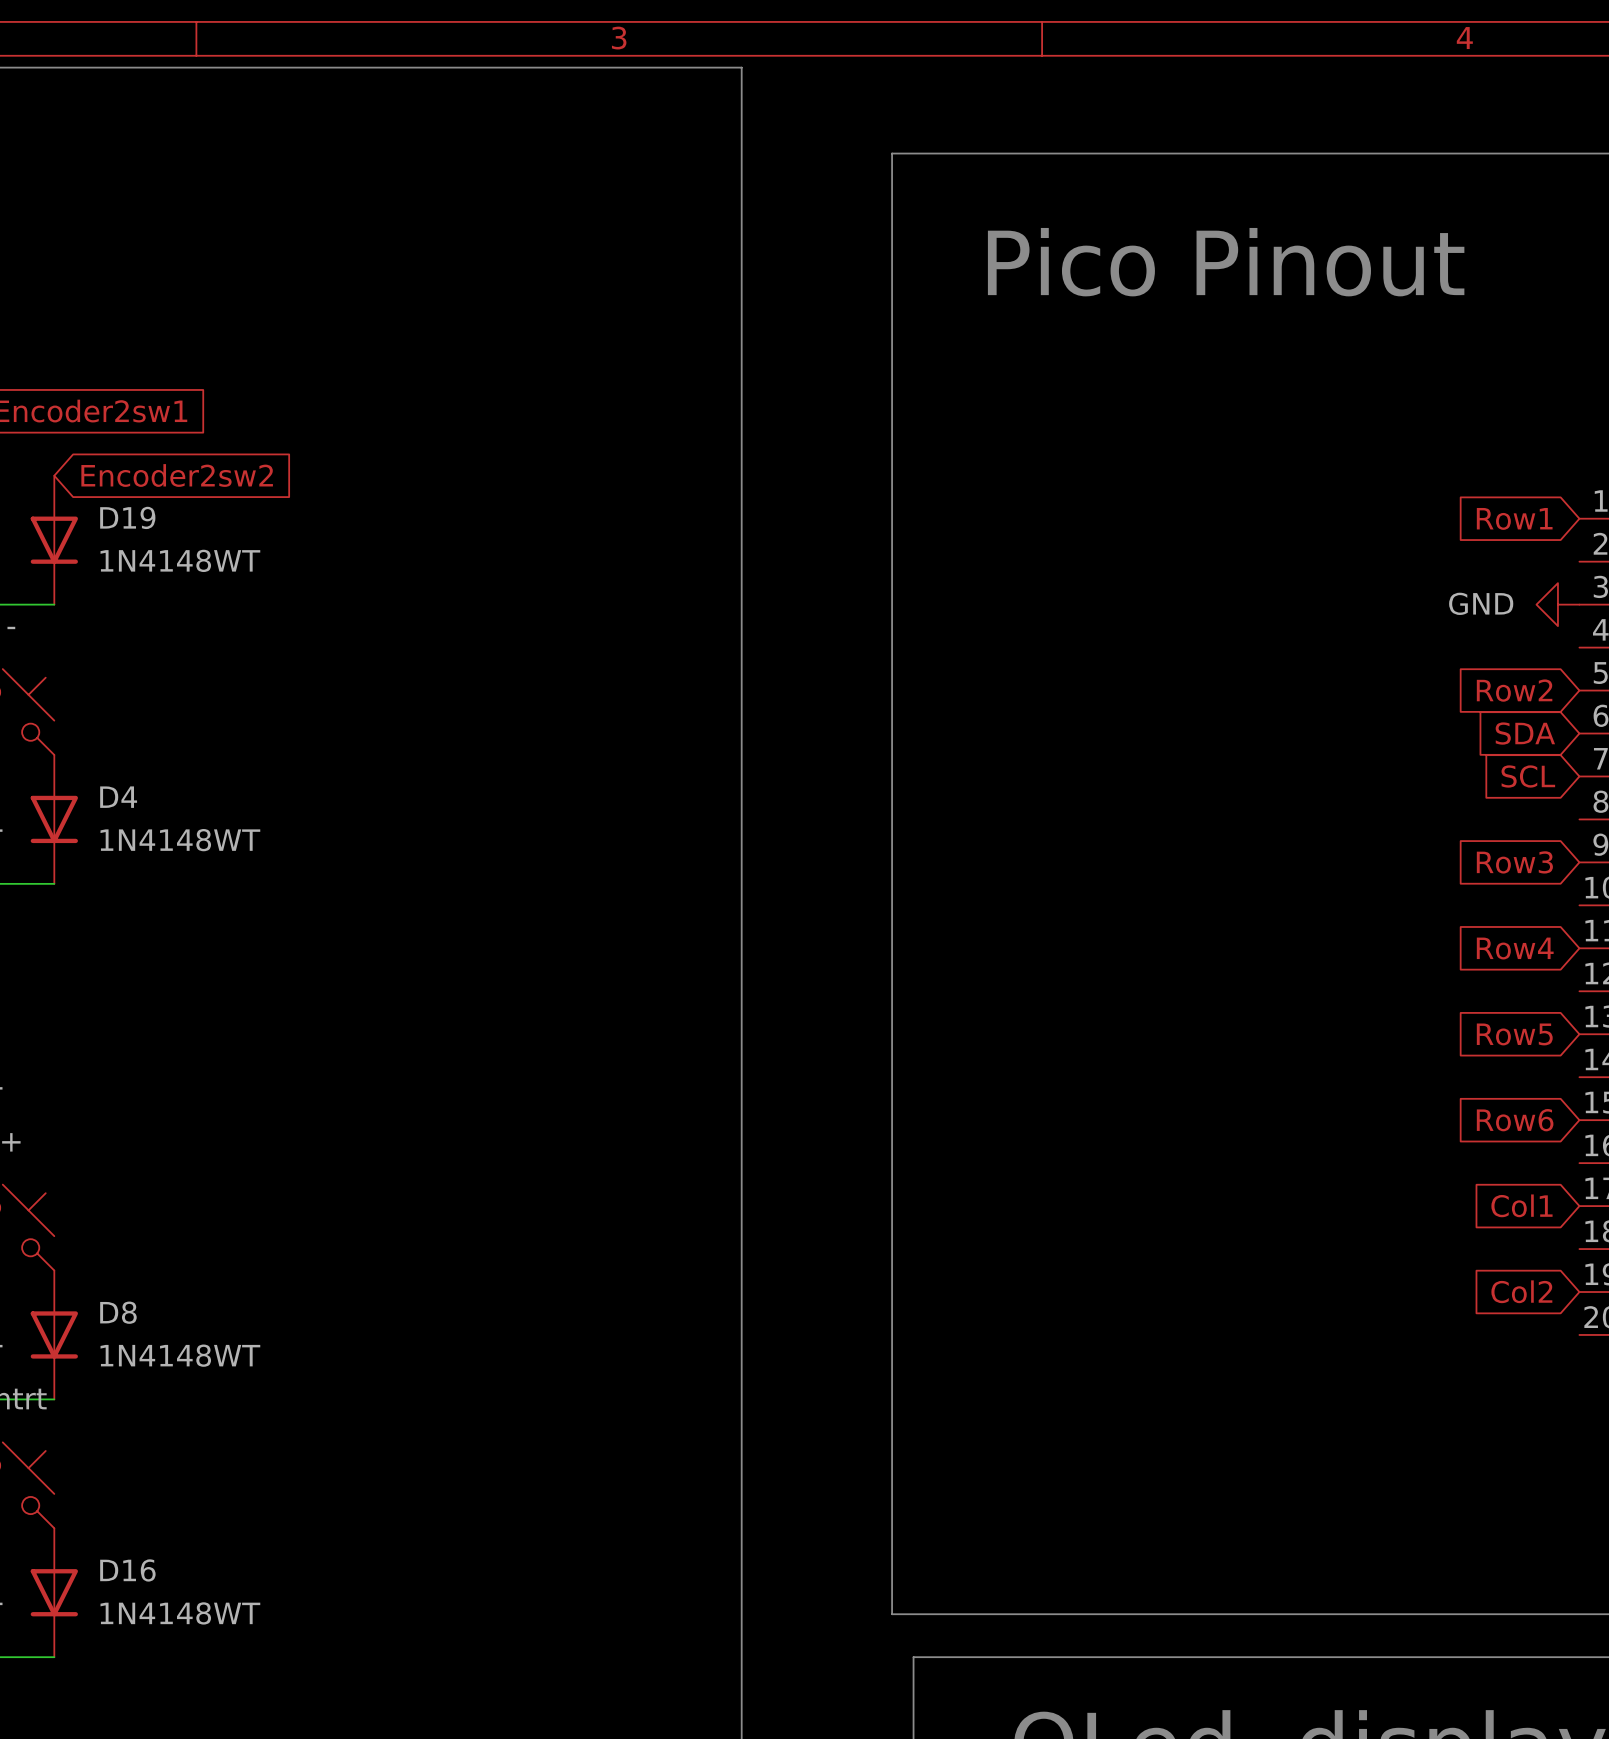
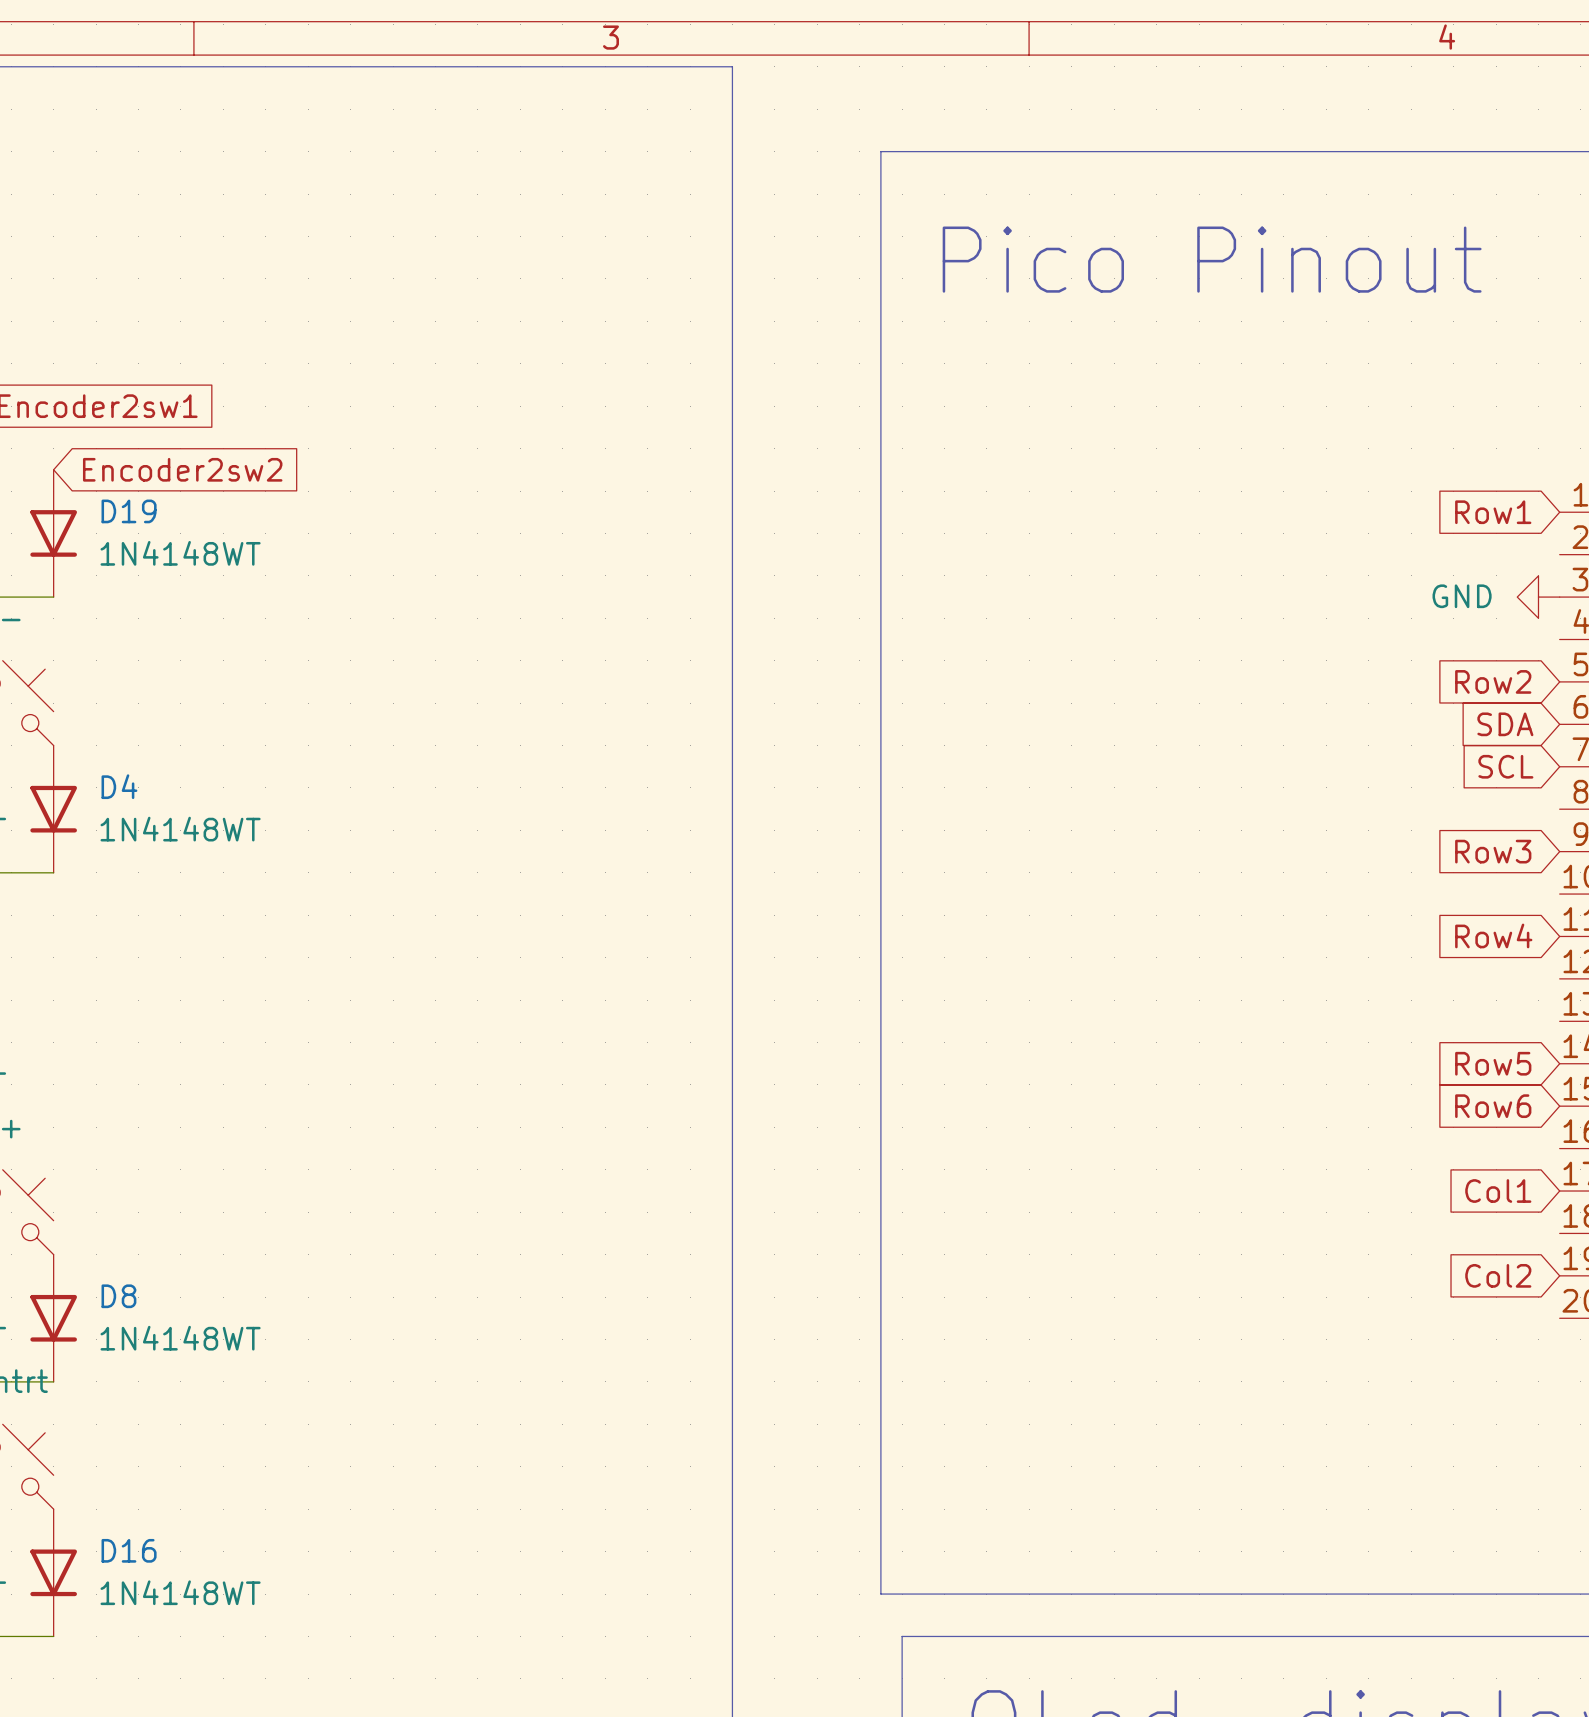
global label position: Row5 (1514, 1034) -> Row5 (1493, 1063)

